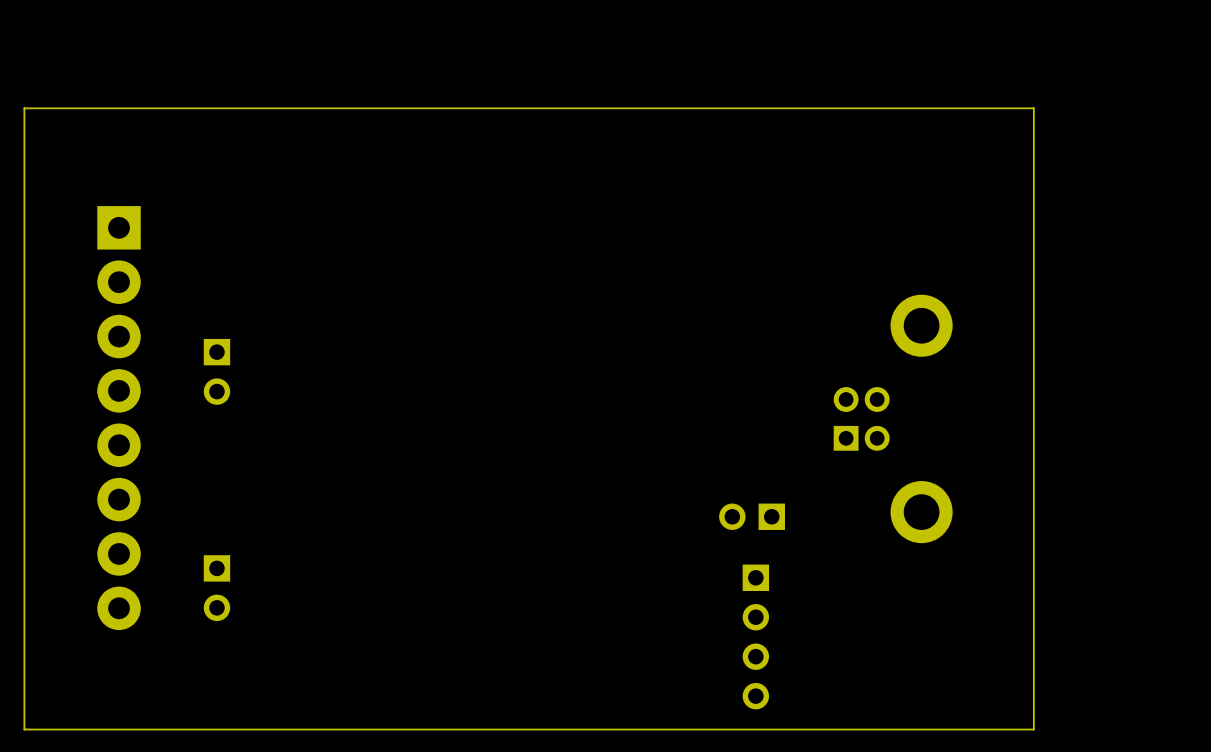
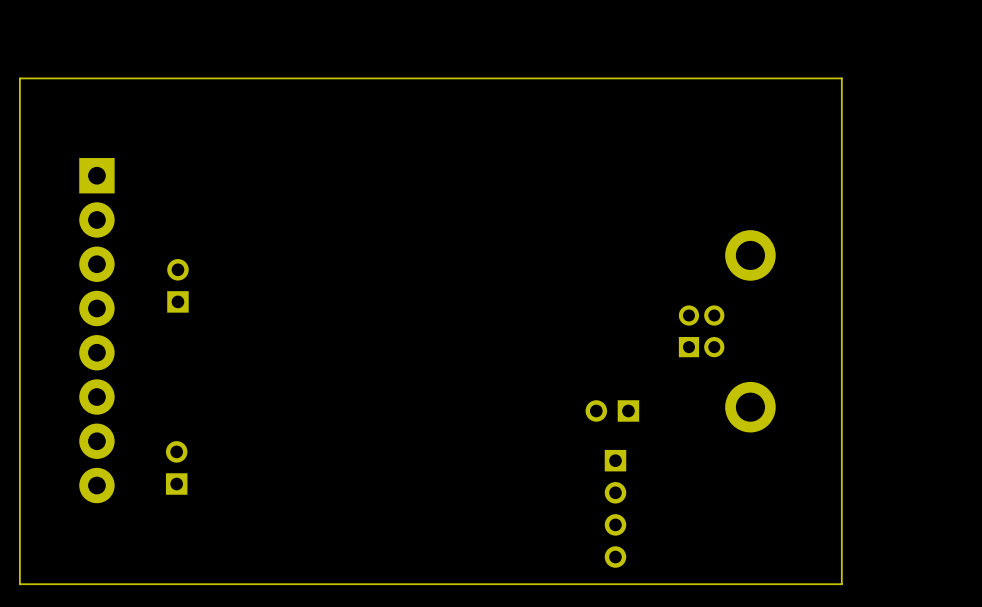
part rotation: 0° (216, 371) -> 180° (177, 285)
part rotation: 0° (216, 588) -> 180° (176, 467)

